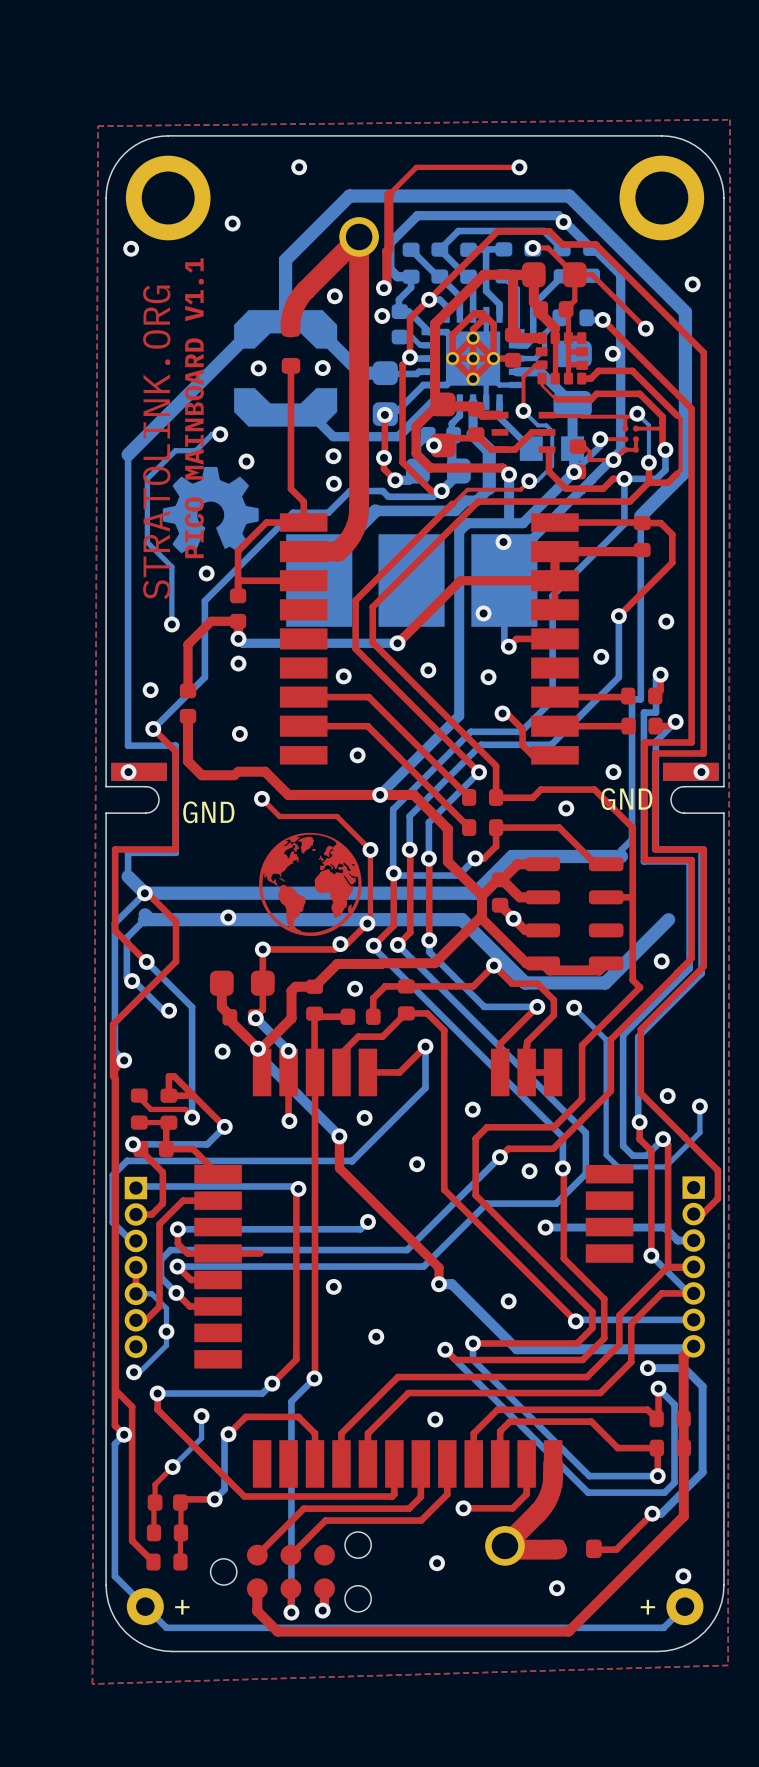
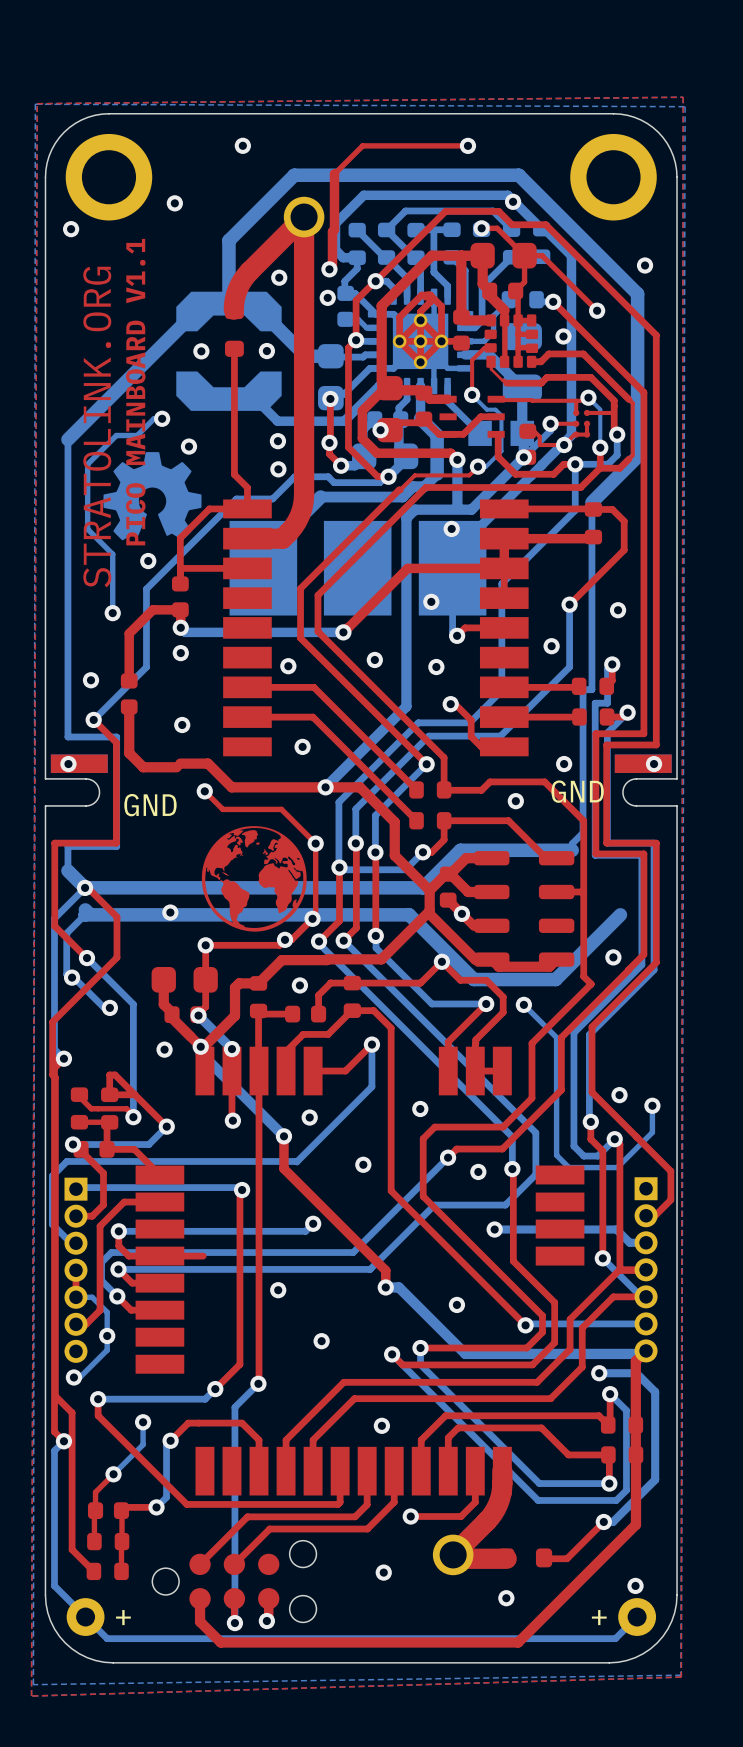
bottom zone outline: none -> (35, 104) (685, 106) (681, 1675) (33, 1684) (35, 104)

